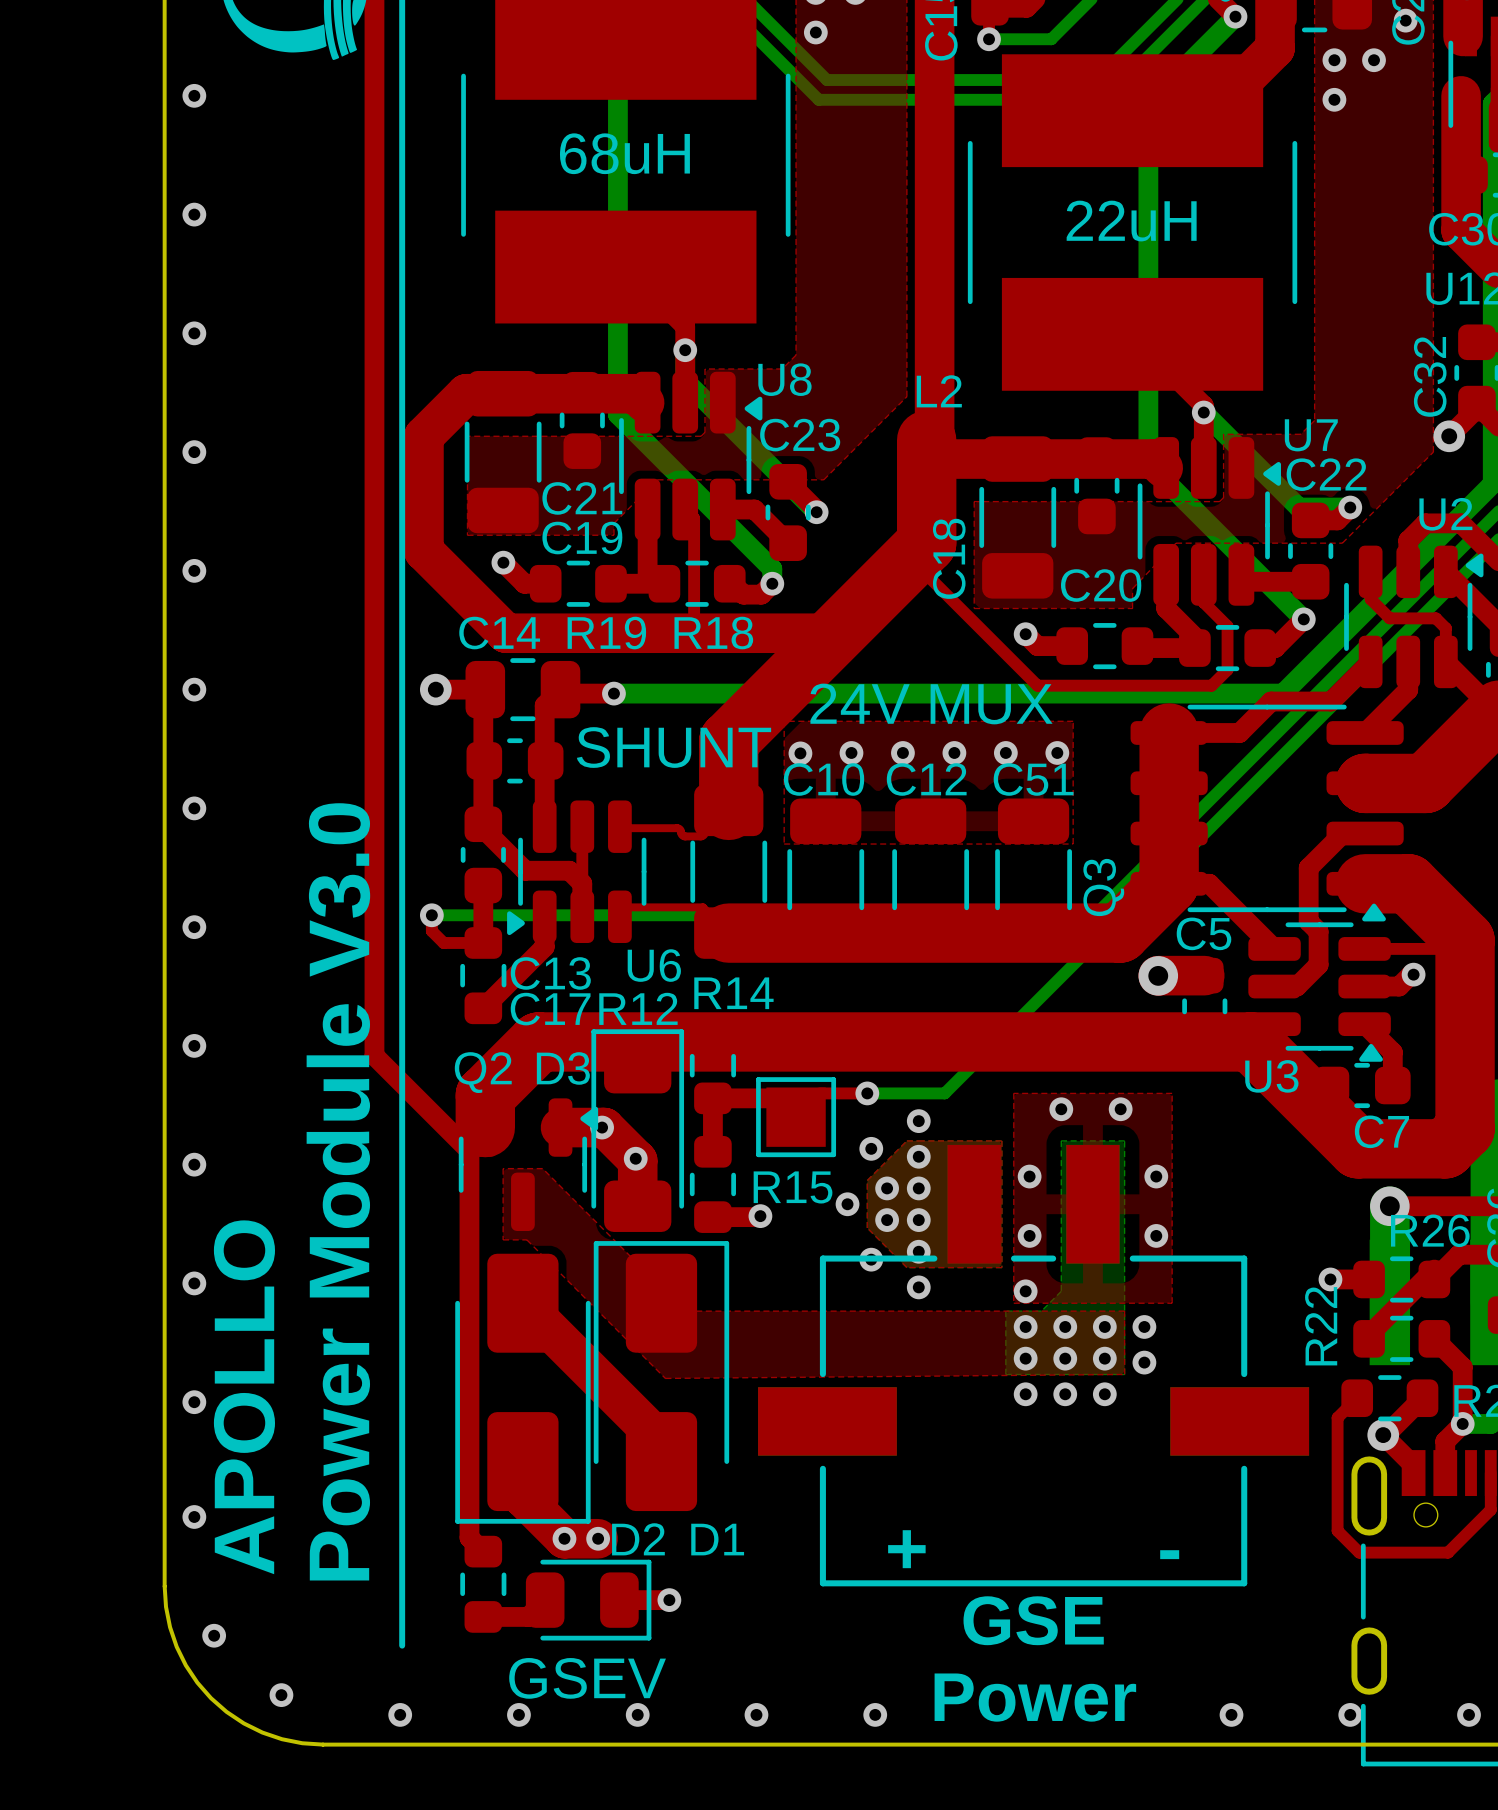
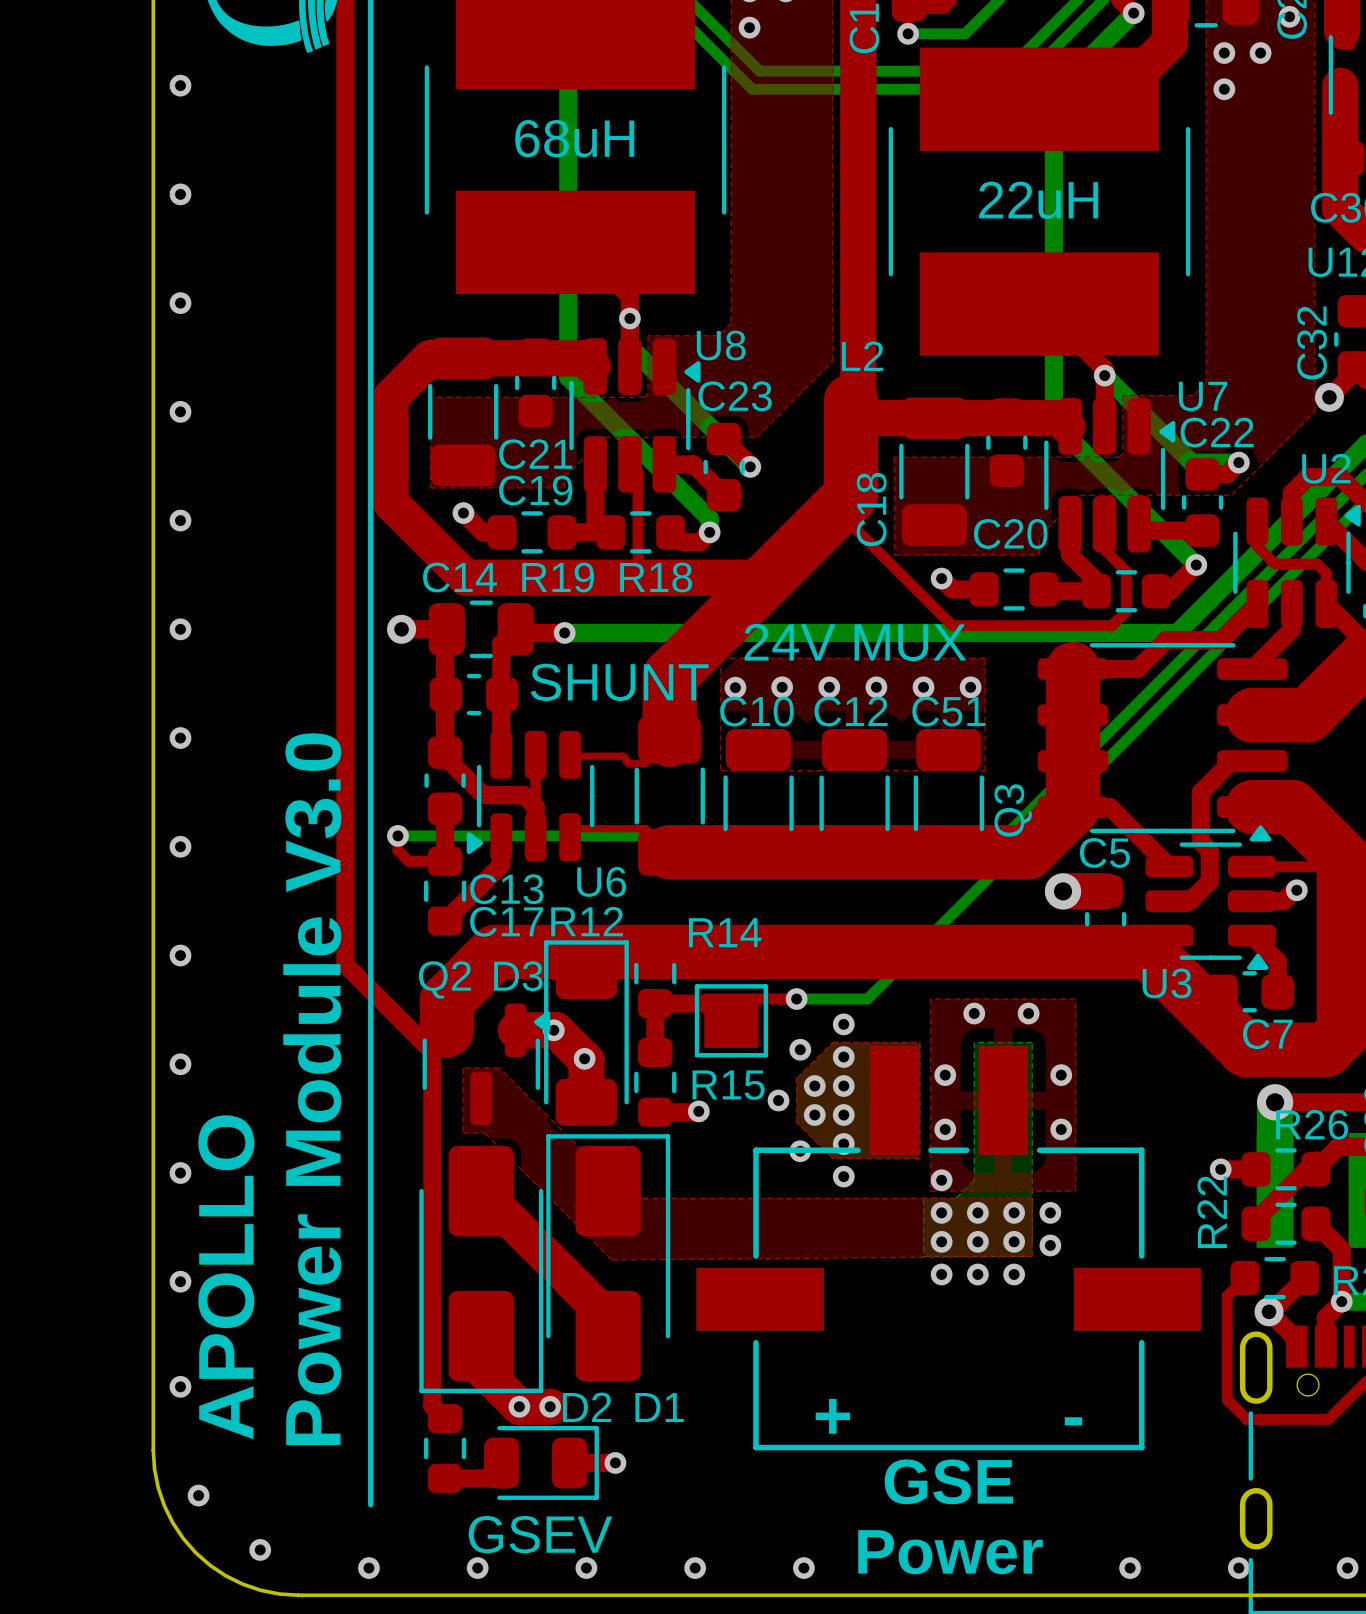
R14 name position: R14 (733, 993) -> R14 (725, 932)

